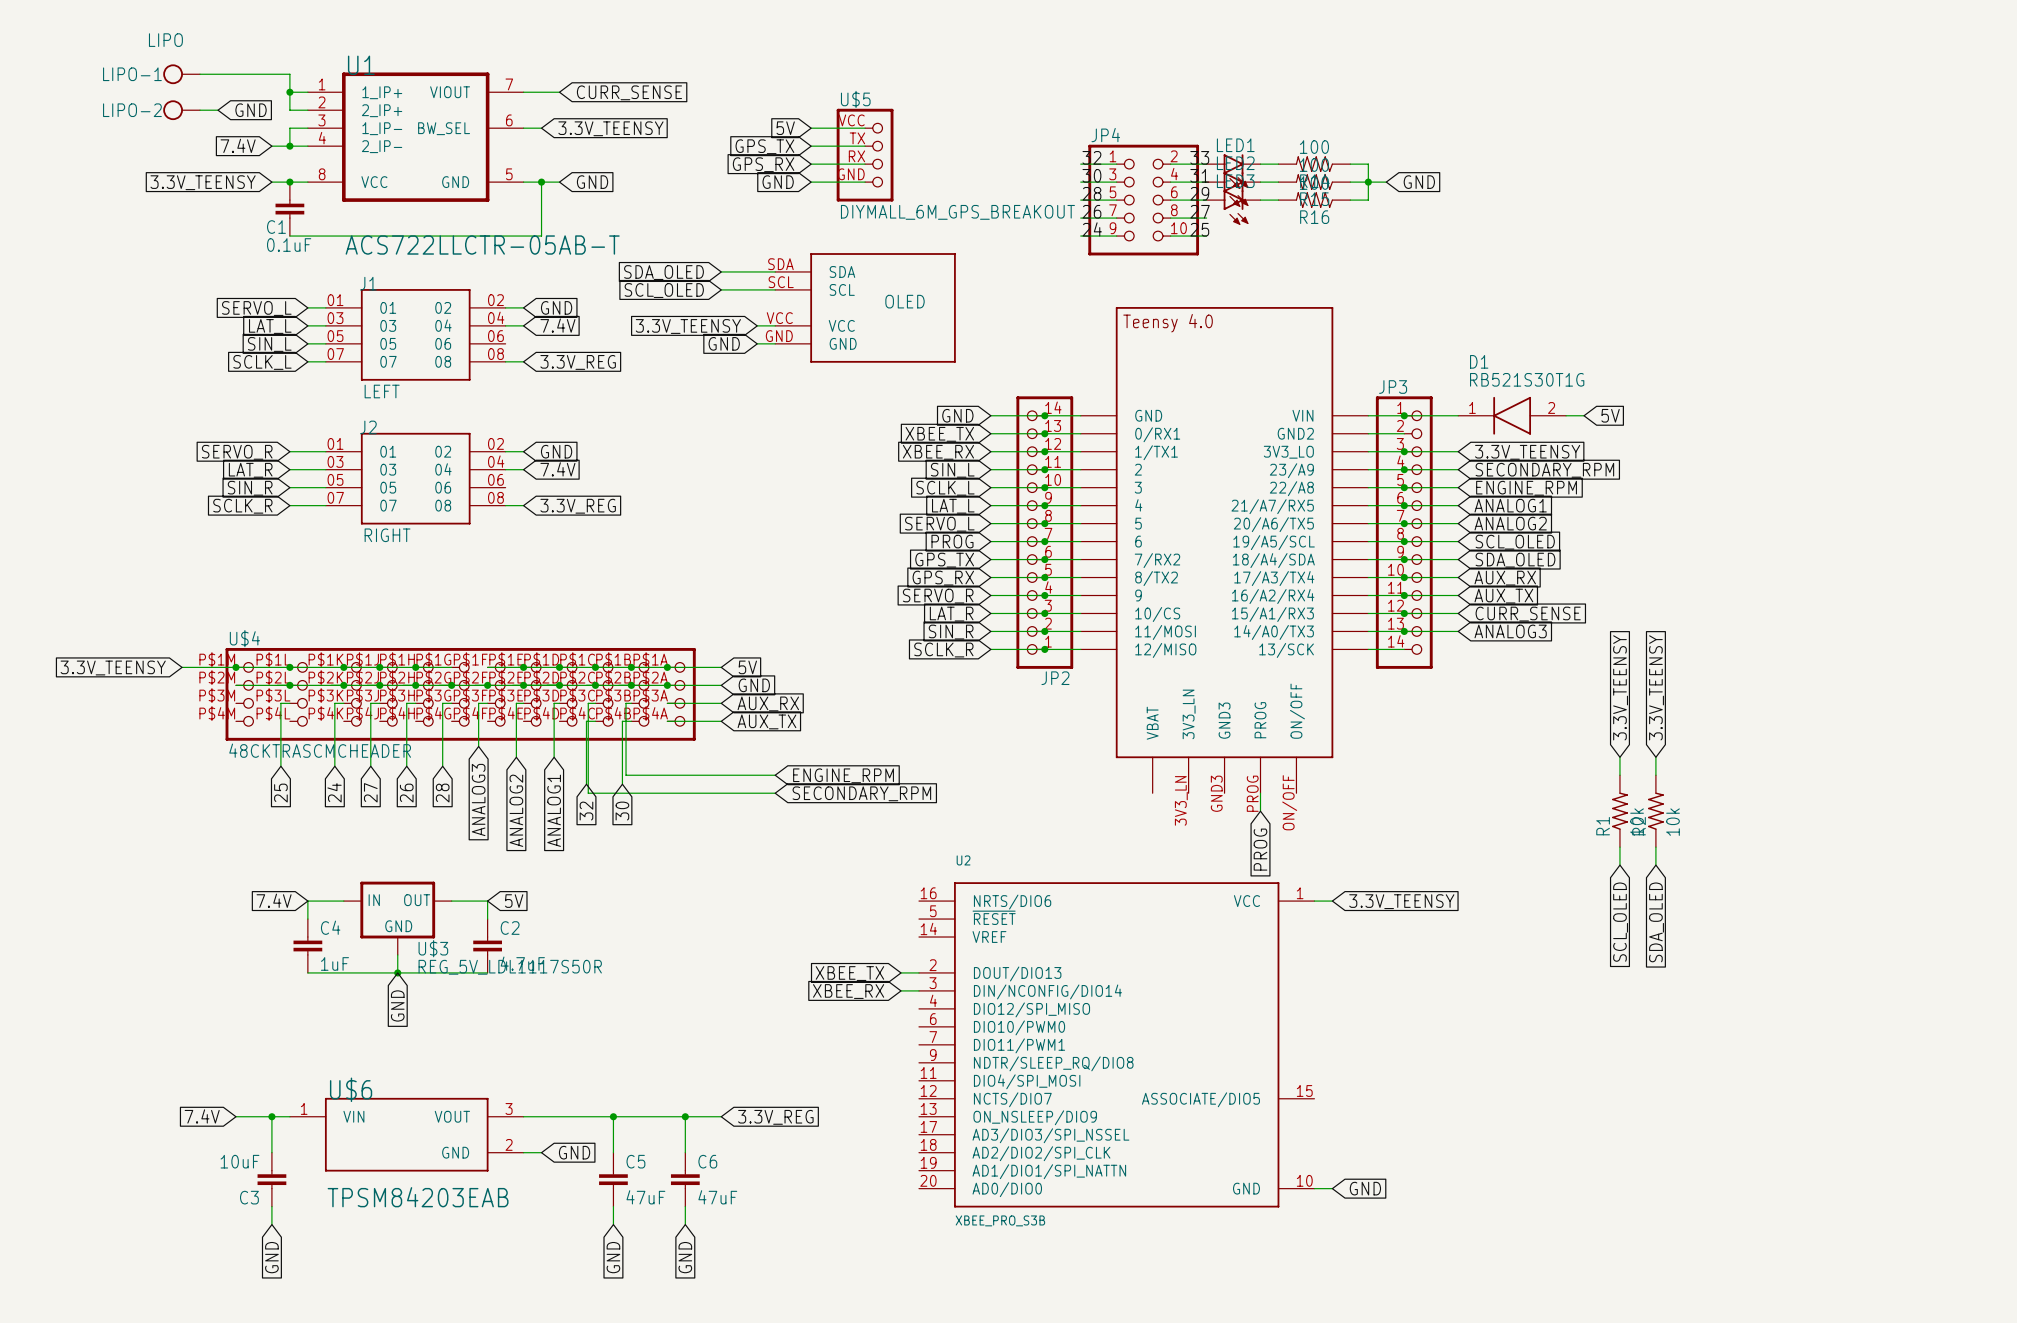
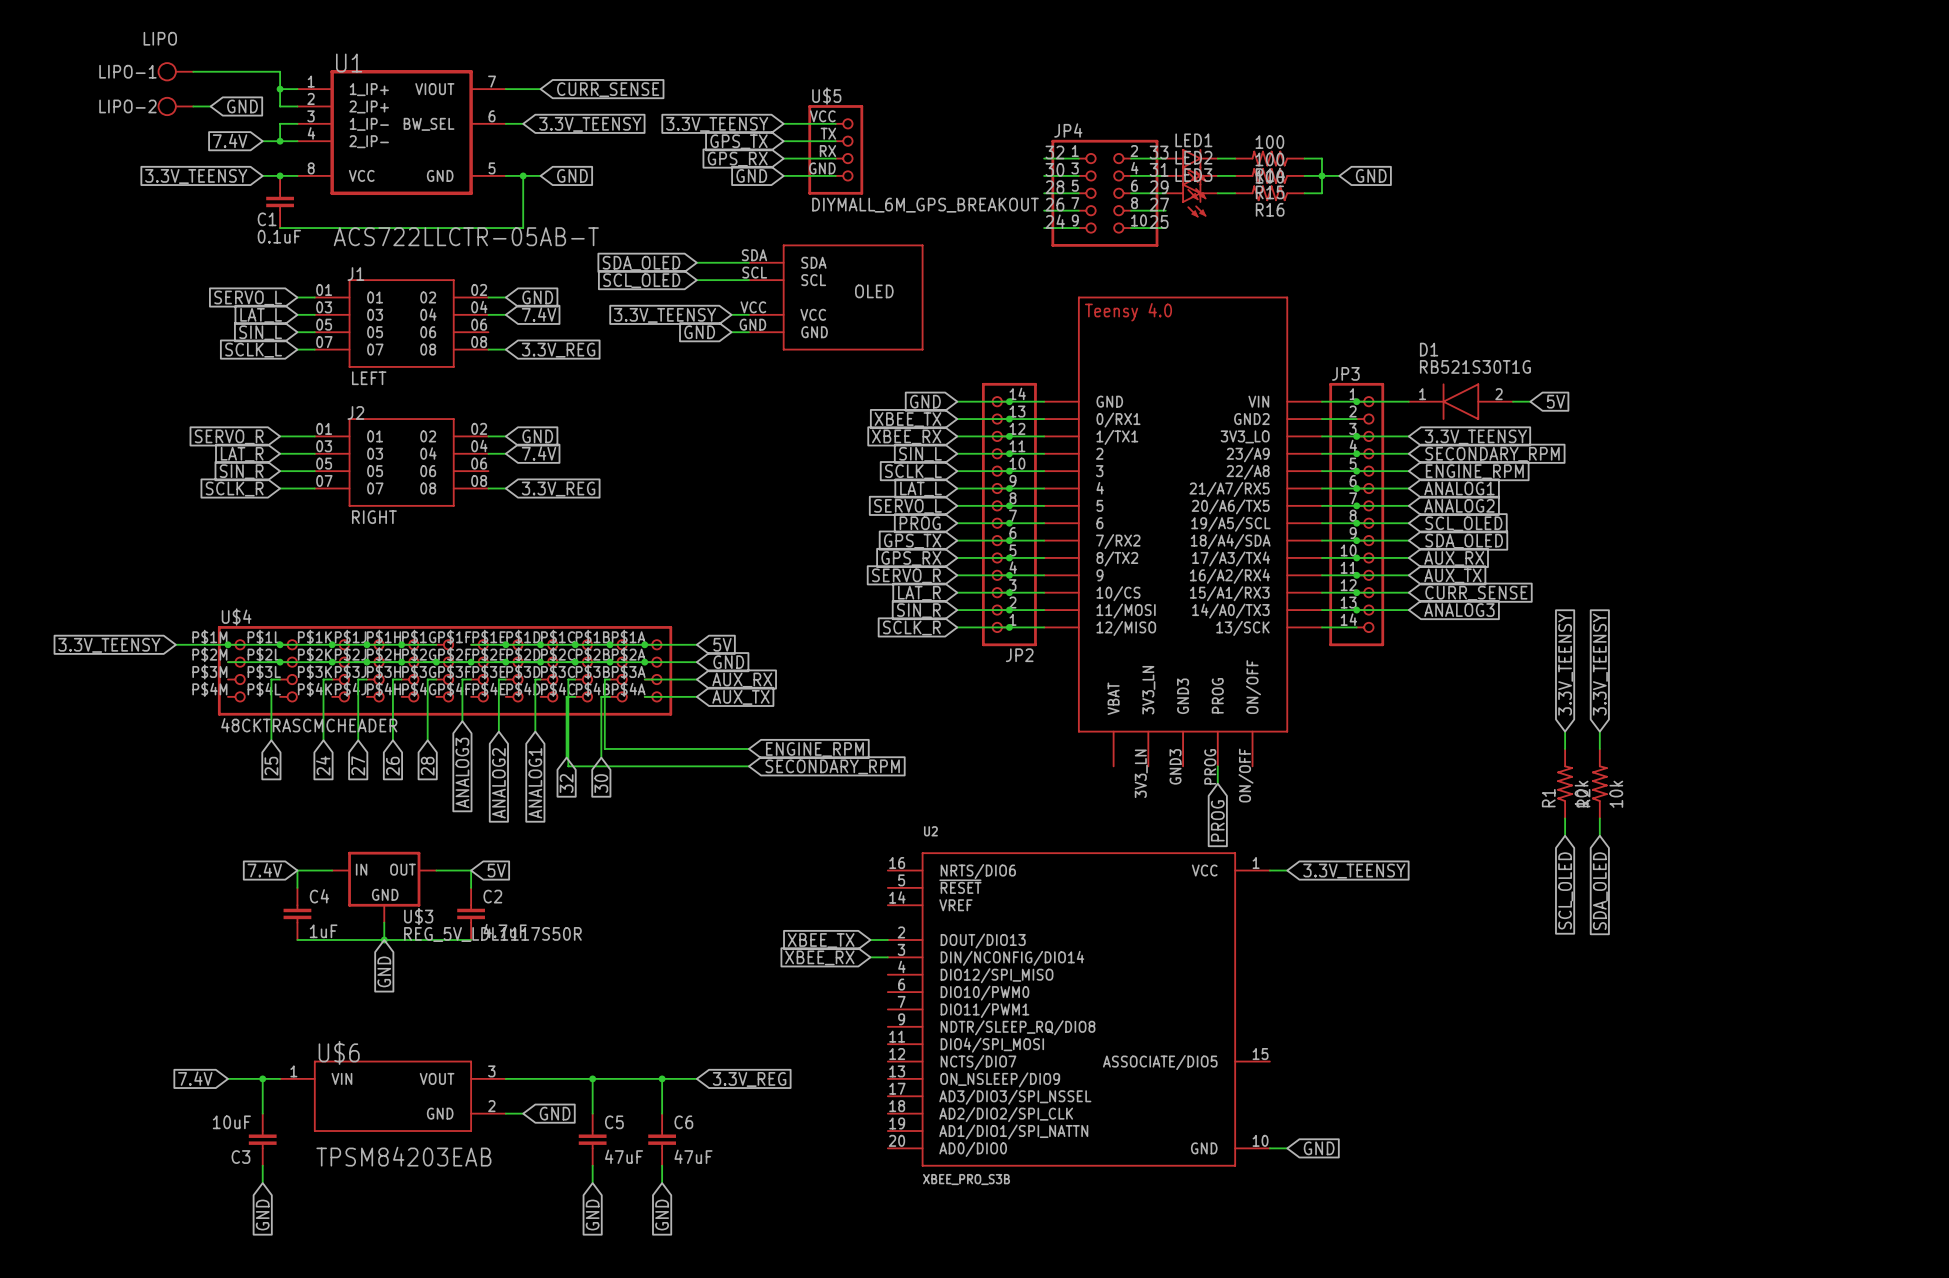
global label: 5V (785, 128) -> 3.3V_TEENSY (717, 124)

